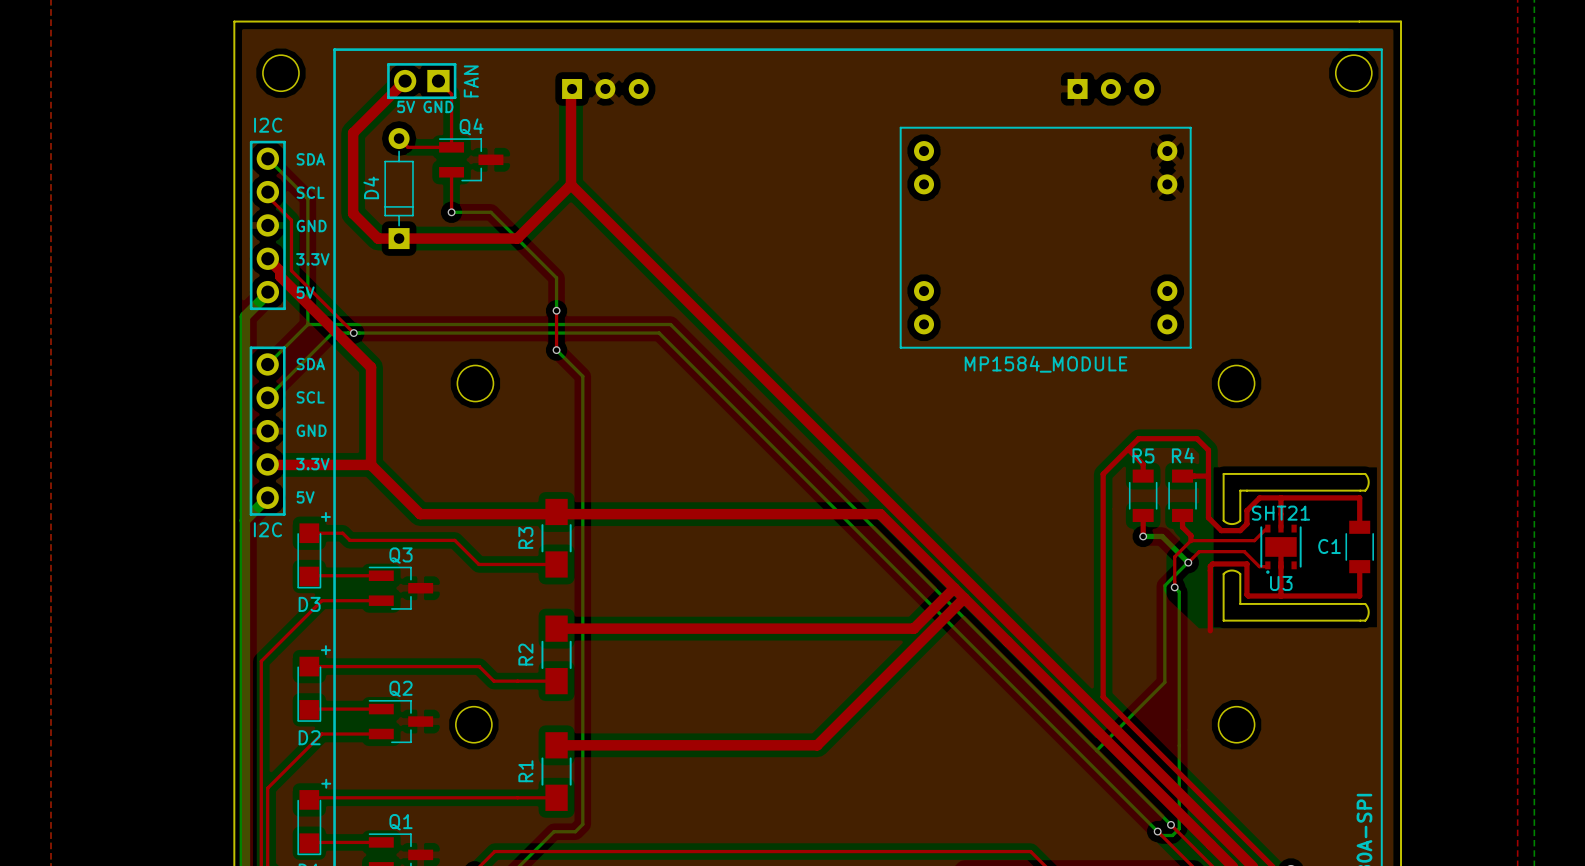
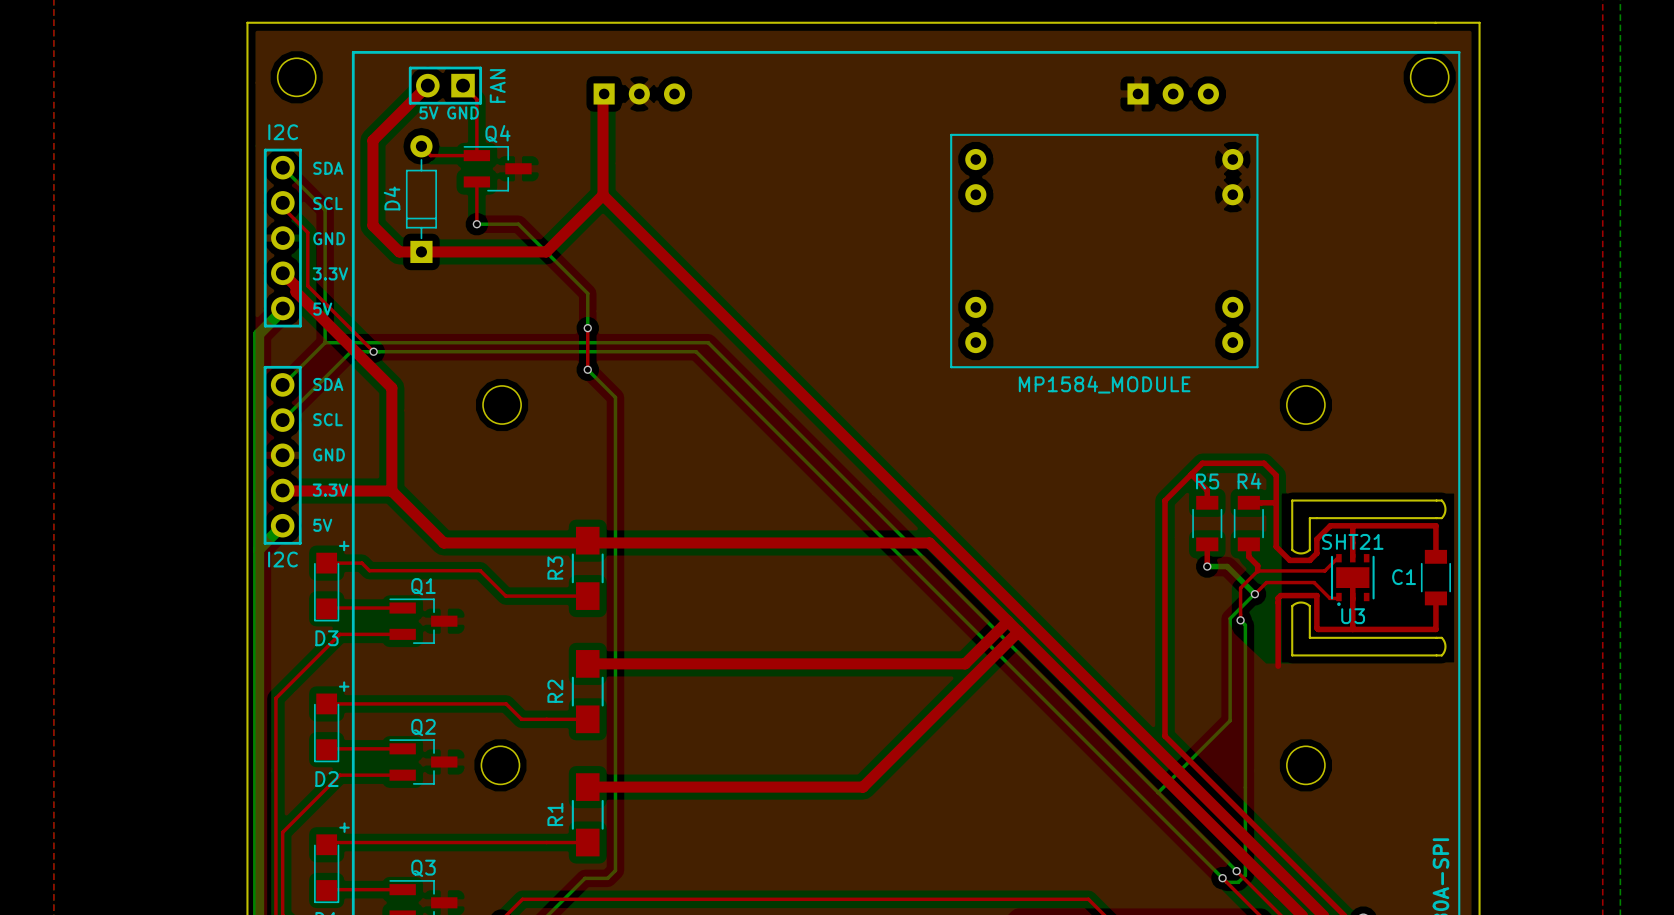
Q3 name: Q3 (400, 555) -> Q1 (423, 586)
Q1 name: Q1 (400, 822) -> Q3 (423, 868)

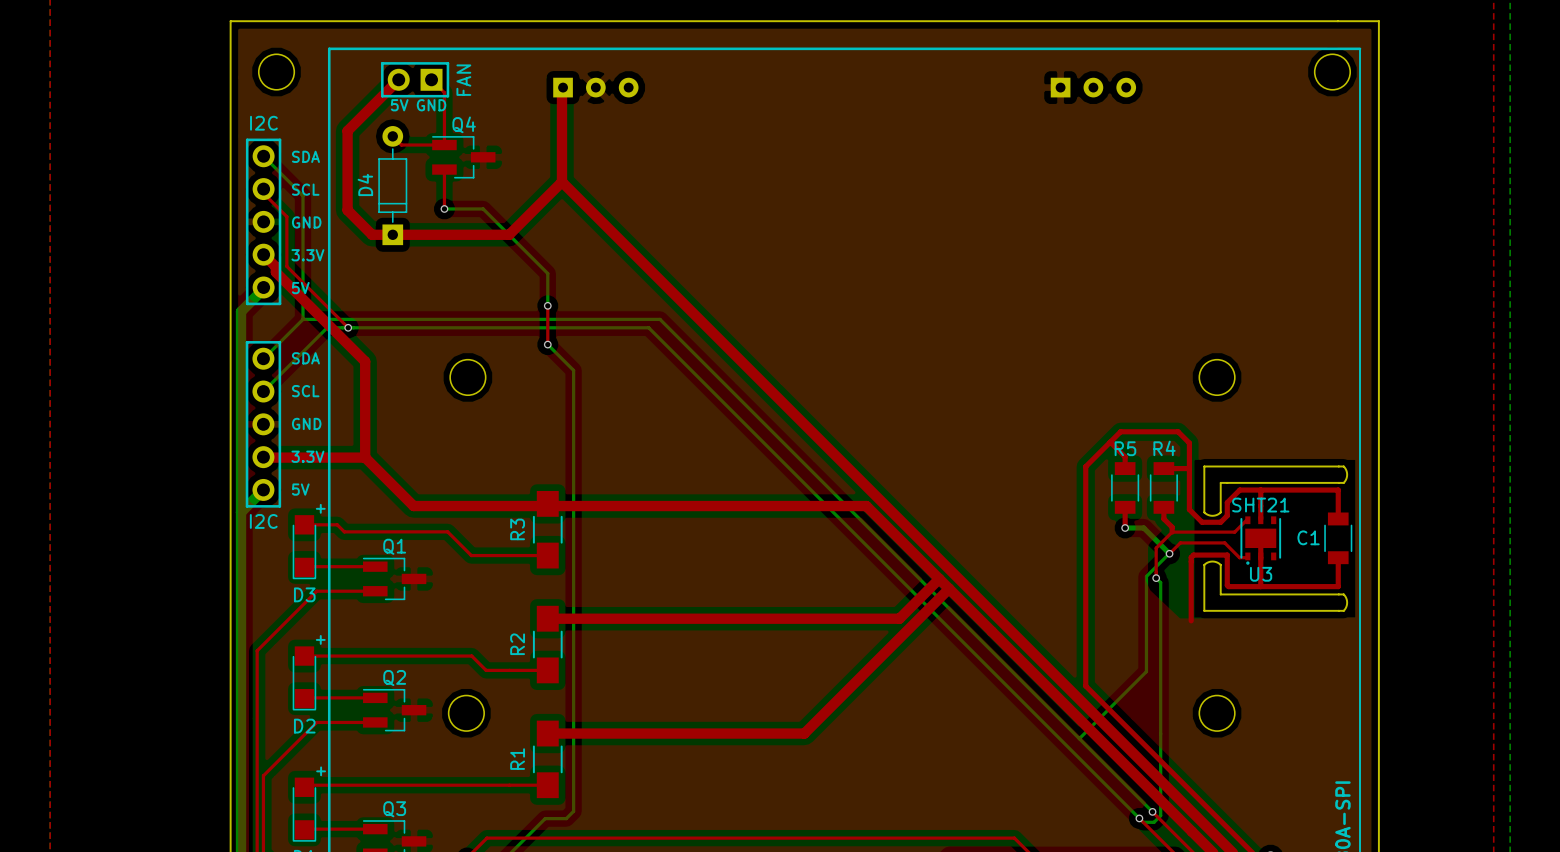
part: MP1584_MODULE (1104, 251) -> none

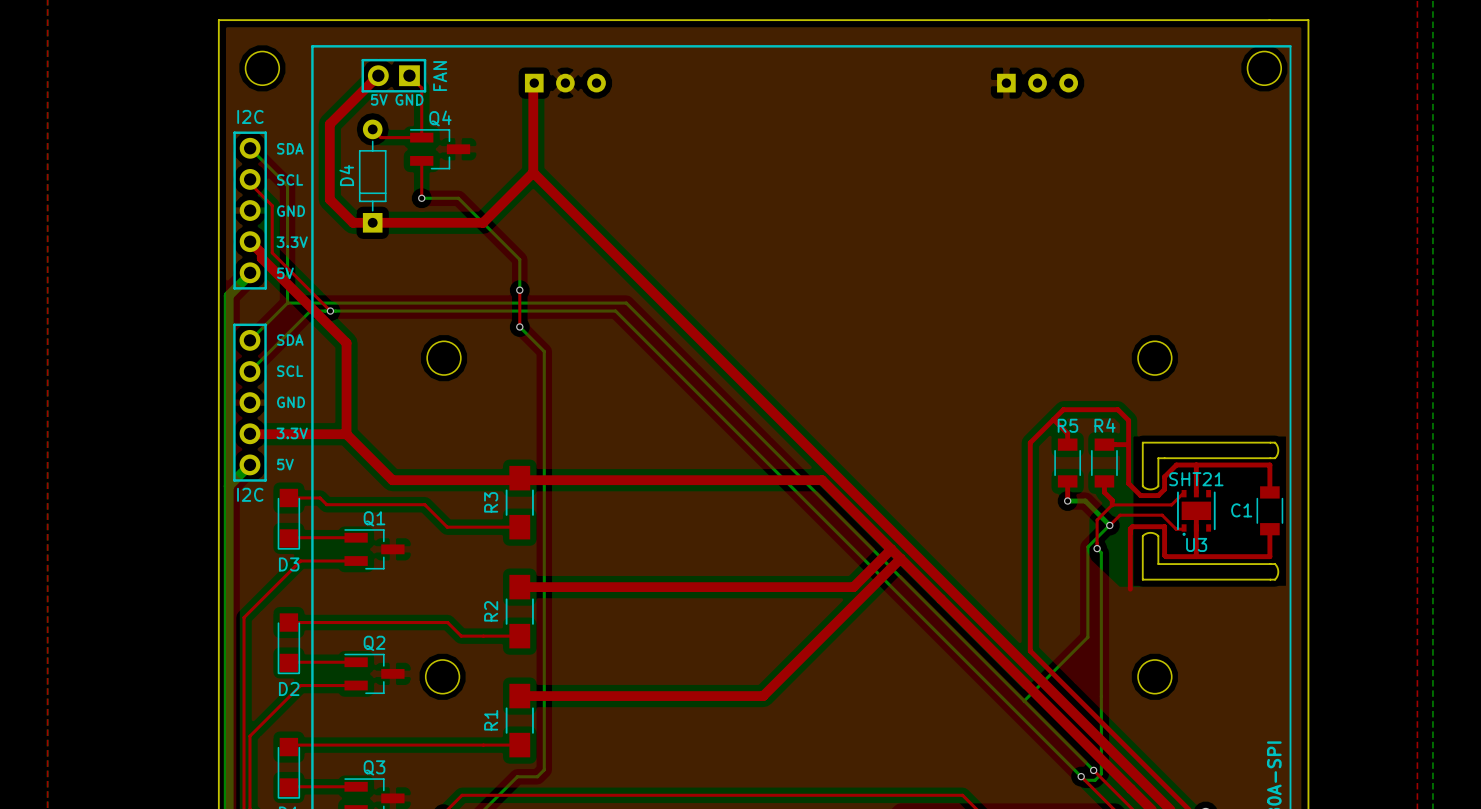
text: + (320, 508) -> none
text: + (320, 639) -> none
text: + (321, 771) -> none

